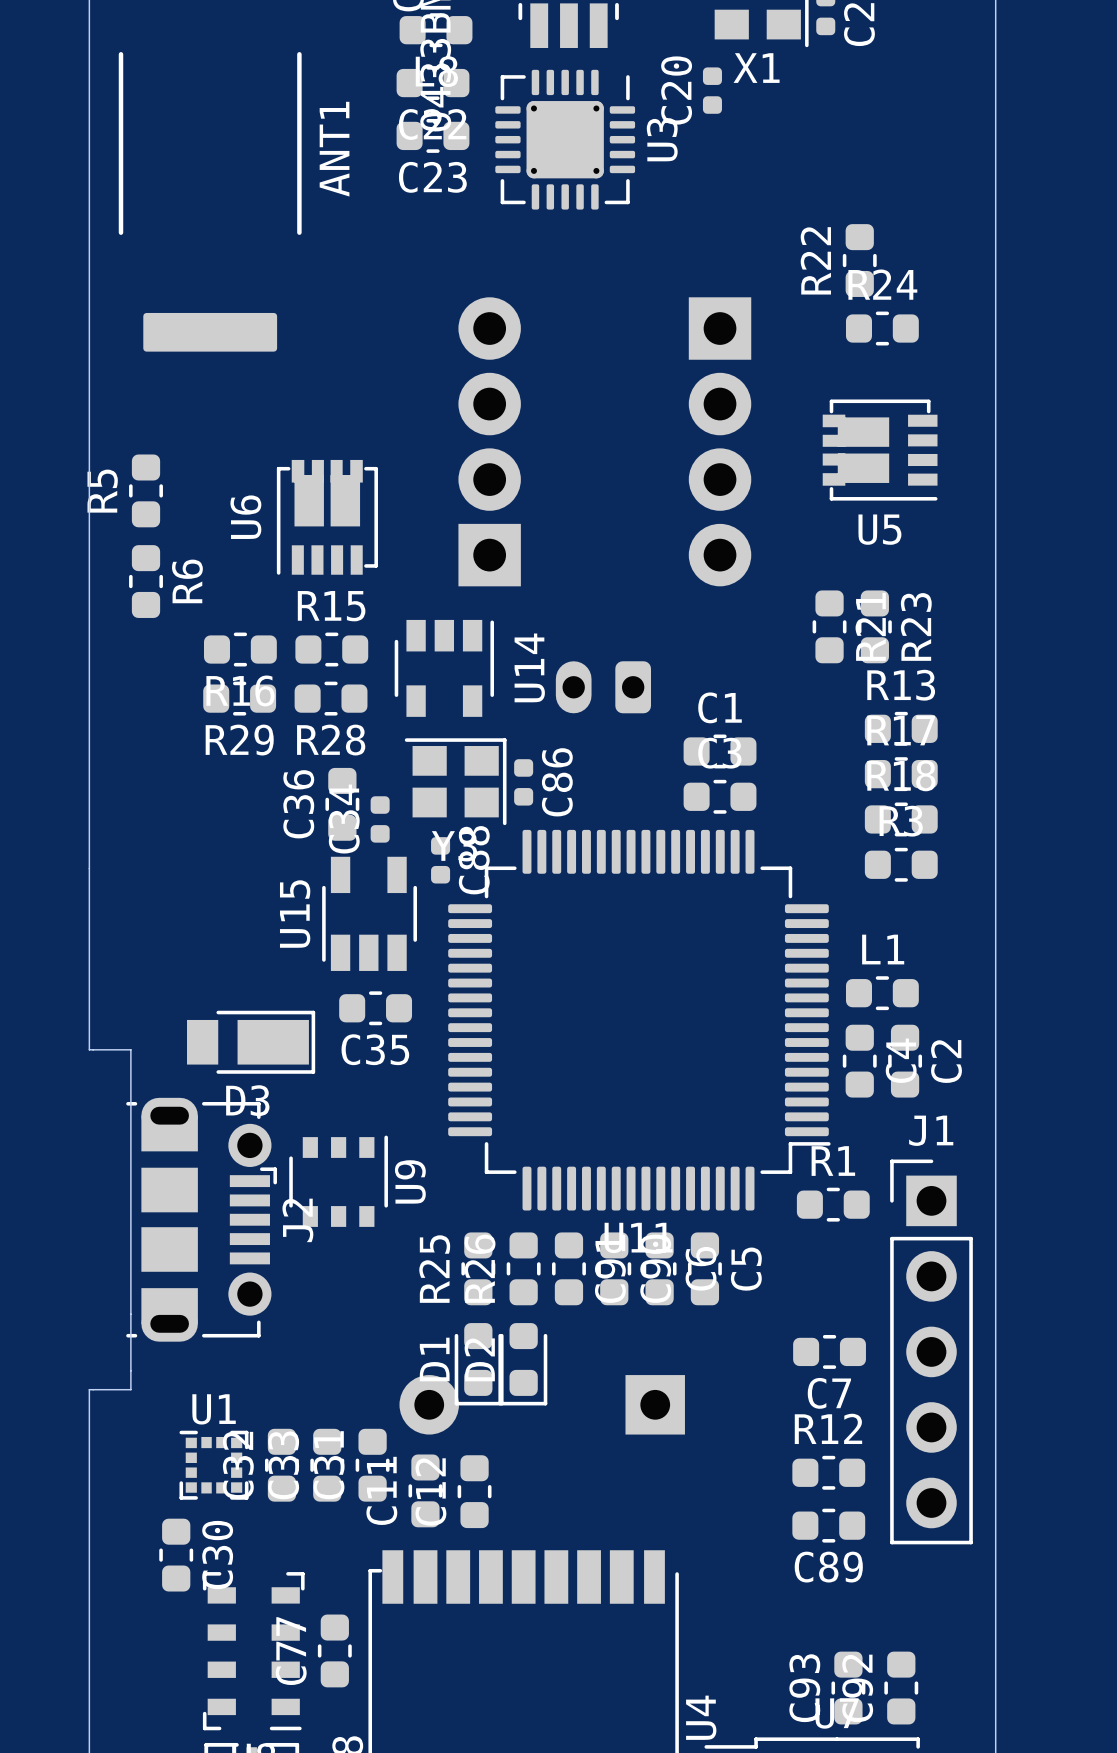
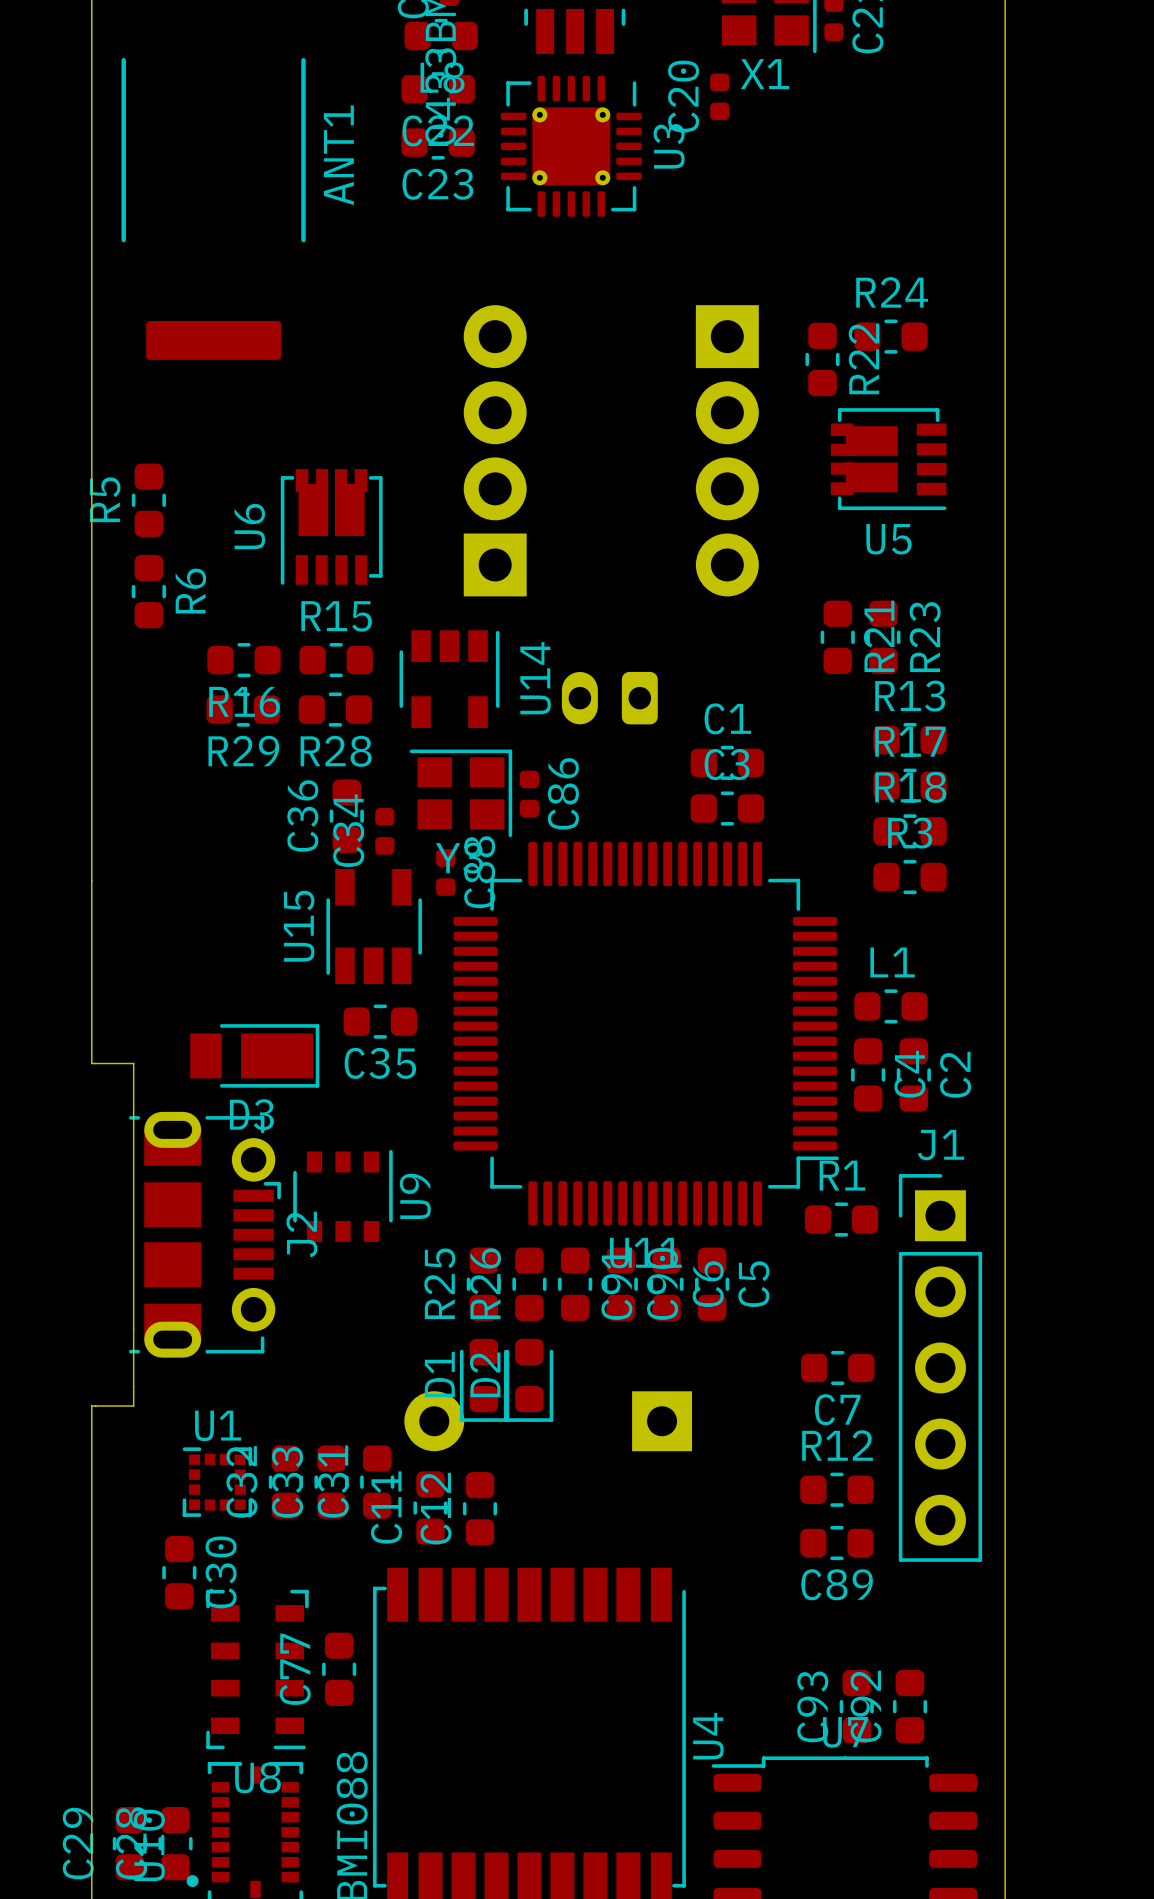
R22 name position: R22 (815, 260) -> R22 (863, 358)
R22 position: (859, 260) -> (822, 359)

